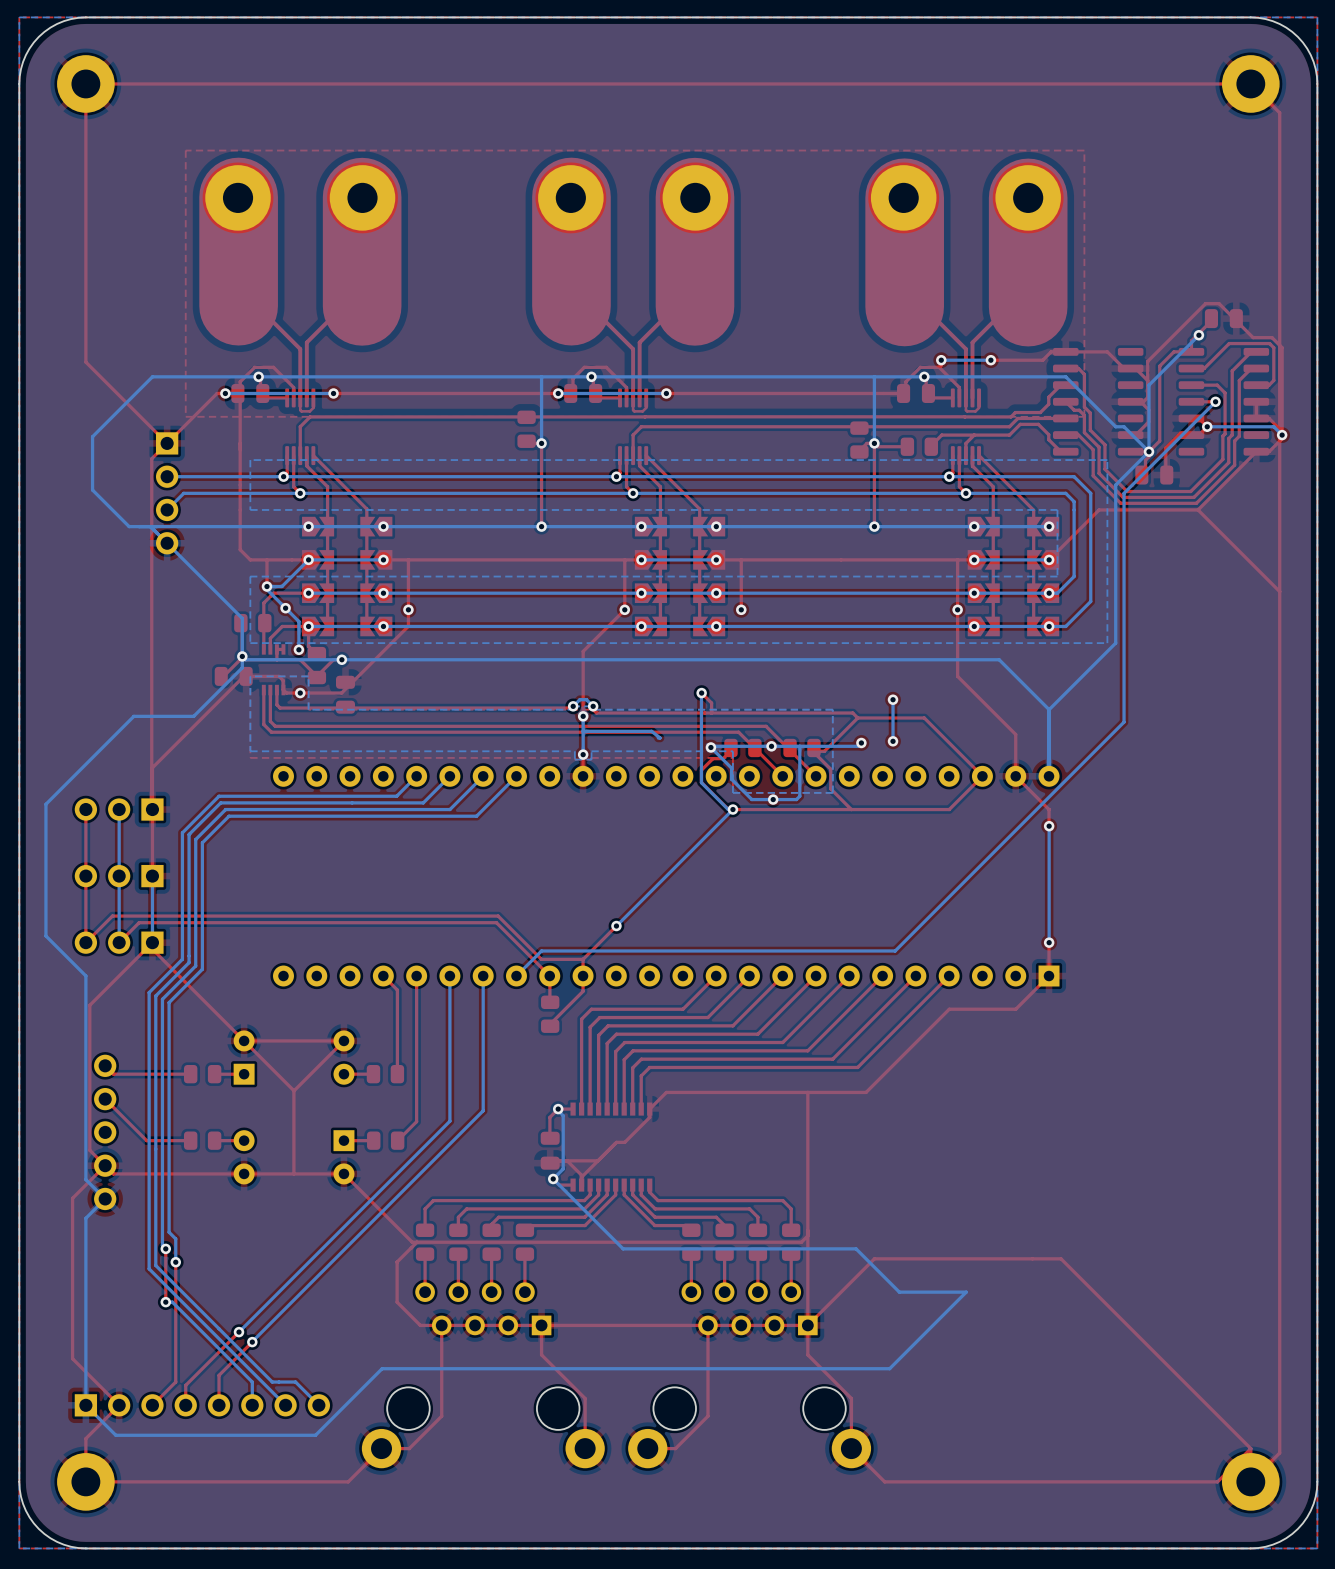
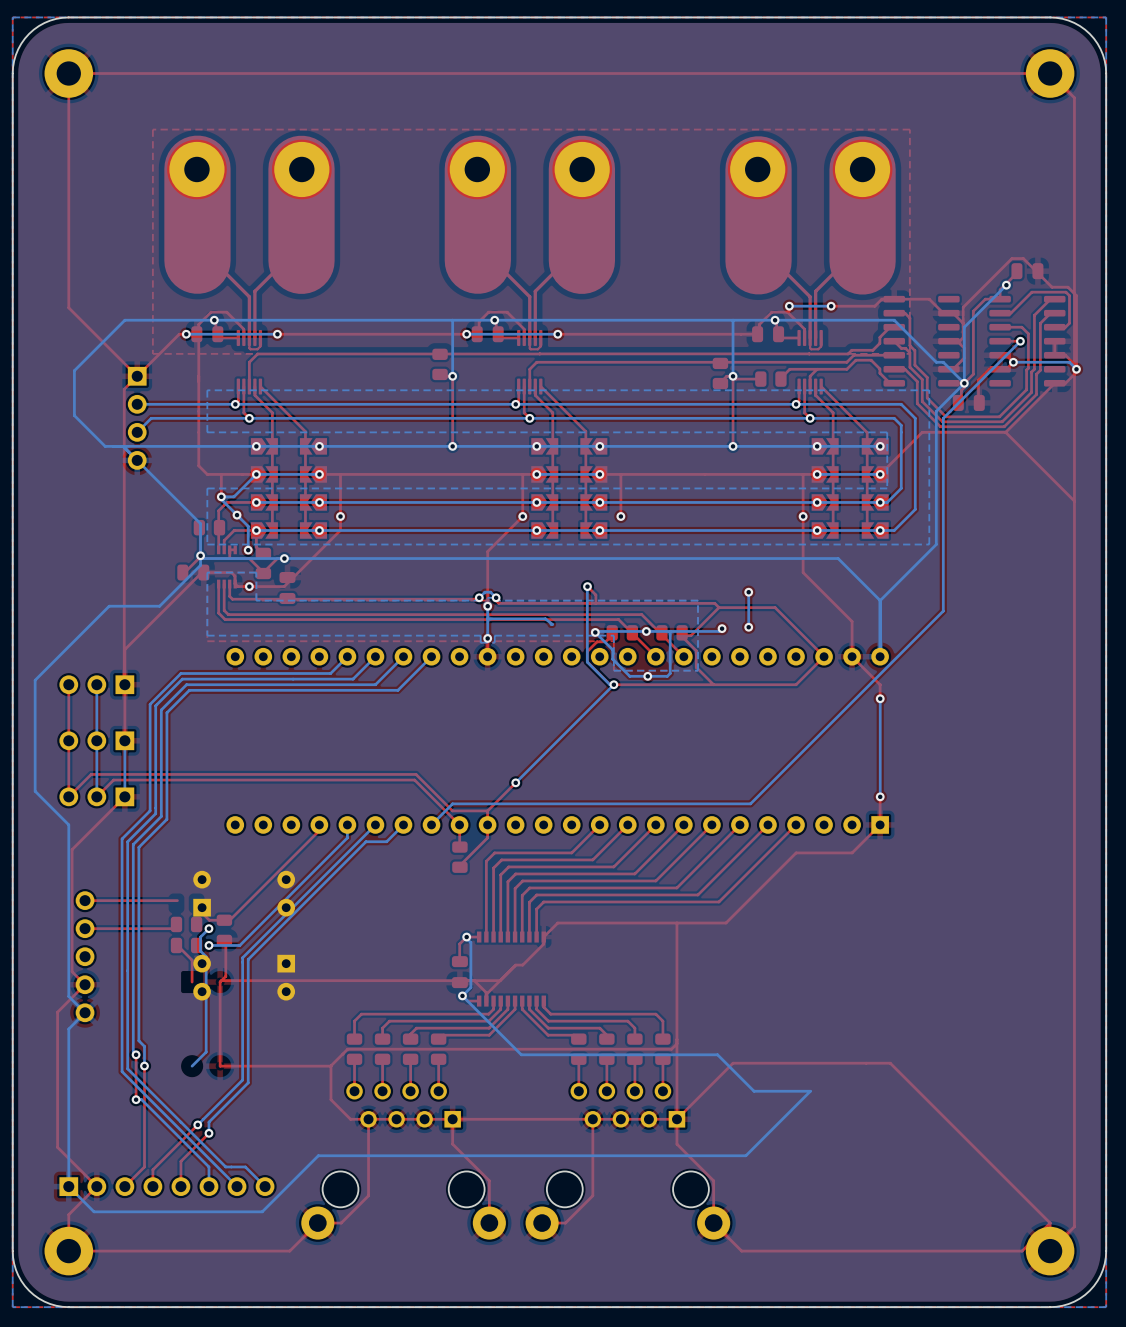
top track: (152, 942) (152, 949) (294, 1090) (293, 1173) -> none
top track: (383, 976) (397, 990) (397, 1074) -> none
top track: (416, 976) (416, 1121) (397, 1140) -> none
bottom track: none -> (347, 824) (347, 837) (239, 945) (208, 945)
bottom track: (449, 976) (449, 1121) (292, 1278) -> (375, 824) (242, 957) (242, 1080)
bottom track: (483, 976) (483, 1110) (252, 1341) -> (403, 824) (386, 841) (365, 841) (248, 959) (248, 1082) (208, 1122) (208, 1132)
top track: none -> (319, 830) (229, 920) (209, 920) (195, 906) (195, 900)
top track: (244, 1040) (343, 1040) (293, 1090) -> none
top track: (105, 1065) (113, 1074) (190, 1074) -> (85, 900) (177, 900)
part: (202, 1074) -> none
top track: (244, 1074) (214, 1074) -> none
top track: (373, 1074) (344, 1074) -> none
part: (385, 1074) -> none
part: none -> (186, 924)
top track: (105, 1099) (146, 1140) (190, 1140) -> (85, 928) (172, 928) (176, 924)
bottom track: none -> (208, 928) (200, 937) (200, 951) (206, 956) (206, 1052) (192, 1066)
via: none -> (208, 928)
part: none -> (224, 930)
top track: none -> (225, 943) (225, 976) (220, 982) (220, 1066) (330, 1066)
top track: none -> (177, 945) (192, 960) (192, 982)
part: none -> (186, 945)
via: none -> (208, 945)
part: (202, 1140) -> none
top track: (244, 1140) (214, 1140) -> none
top track: (373, 1140) (344, 1140) -> none
part: (385, 1140) -> none
top track: none -> (459, 980) (221, 980)
top track: (105, 1165) (113, 1173) (343, 1173) (412, 1242) (416, 1242) -> none

